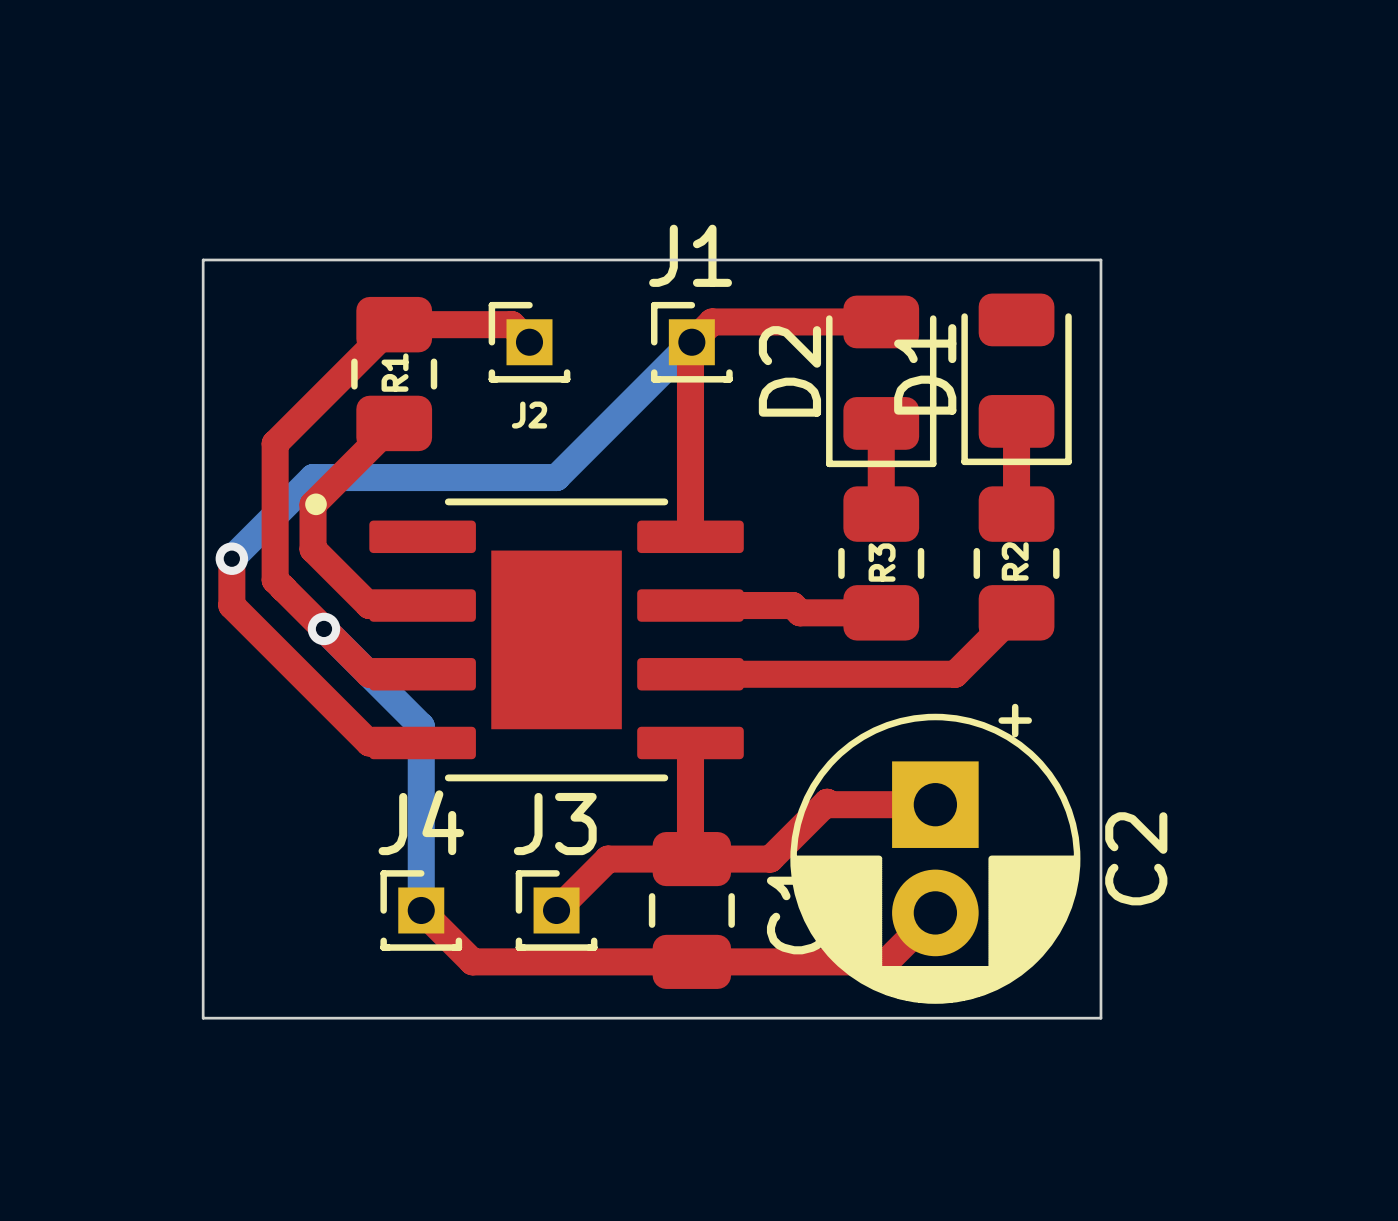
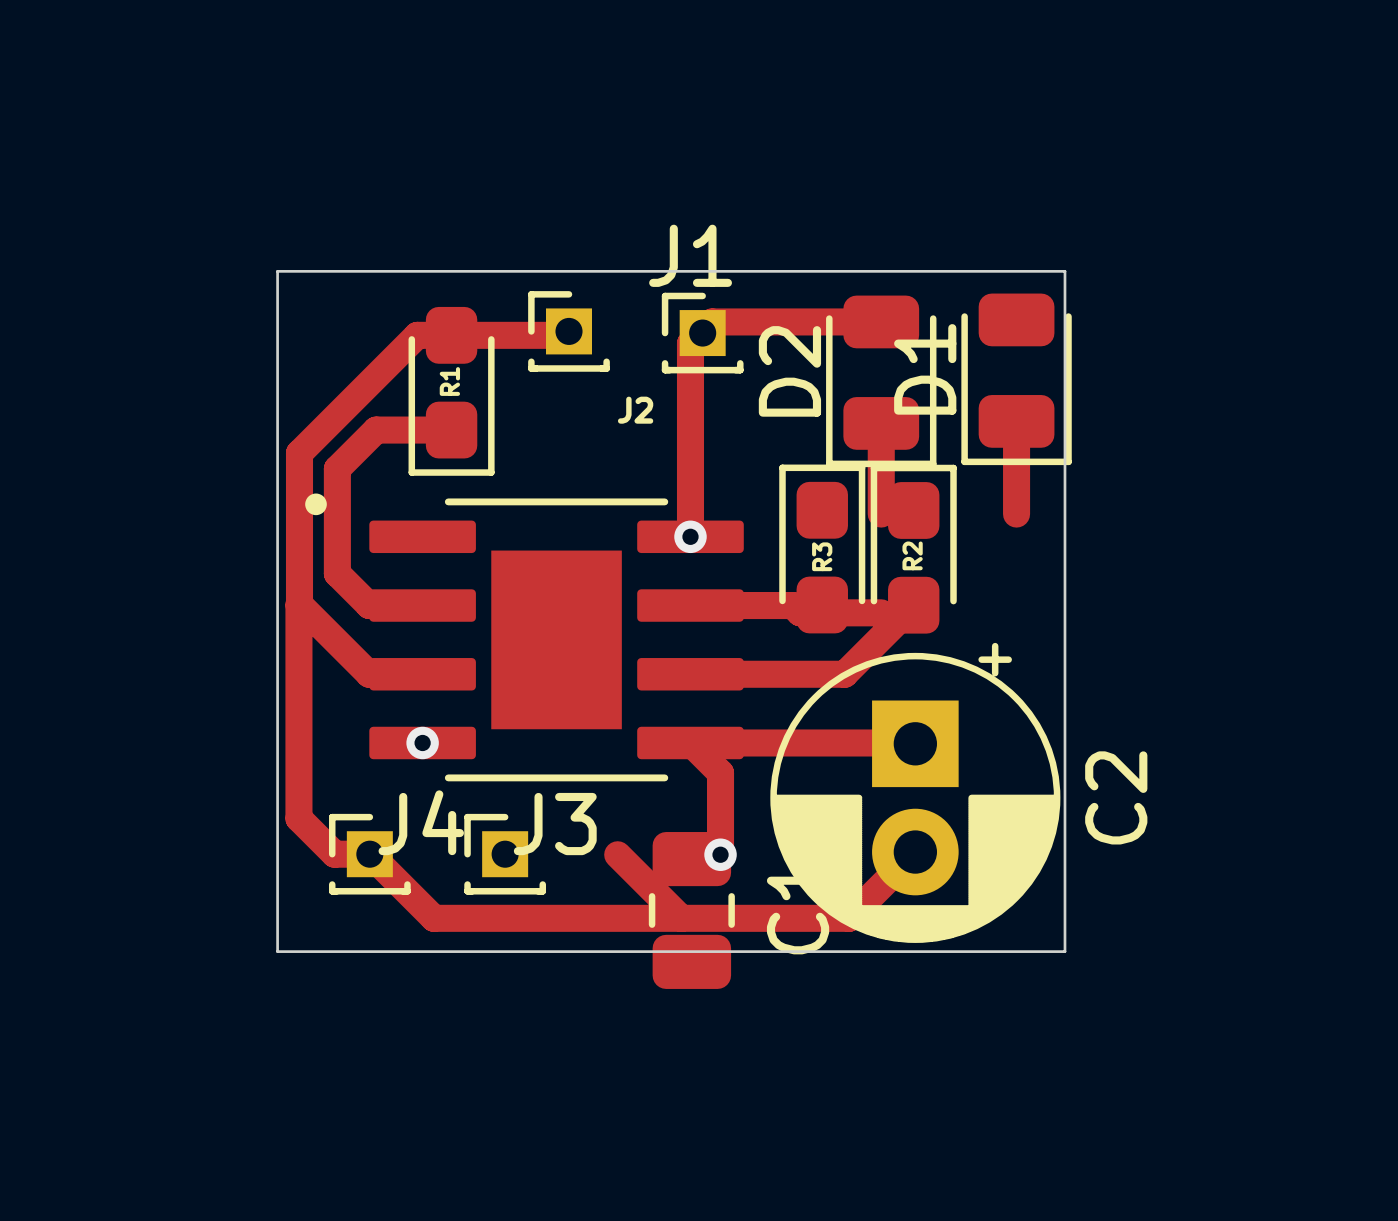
board edge: (203, 259) (1100, 259) (1100, 1018) (203, 1018) (203, 259) -> (277, 271) (277, 951) (1064, 951) (1064, 271) (277, 271)
R1 footprint: [351, 296, 438, 452] -> [408, 306, 495, 476]
top track: (394, 324) (275, 443) (275, 580) (299, 604) -> (569, 331) (565, 335) (417, 335) (299, 453) (299, 604)
top track: (394, 324) (511, 324) (529, 342) -> none
J2 position: (529, 342) -> (569, 331)
bottom track: (691, 342) (556, 477) (313, 477) (231, 558) -> none
J1 position: (691, 342) -> (702, 333)
J2 name position: J2 (529, 415) -> J2 (635, 410)
top track: (394, 423) (313, 504) (313, 549) (337, 573) -> (451, 430) (376, 430) (337, 468) (337, 573)
R3 footprint: [838, 486, 925, 641] -> [779, 464, 866, 634]
R2 footprint: [973, 486, 1060, 641] -> [870, 464, 957, 634]
via: none -> (690, 536)
top track: (231, 558) (231, 605) (369, 742) (422, 742) -> none
via: (231, 558) -> none
top track: none -> (298, 604) (298, 818) (334, 854) (369, 854) (433, 918) (849, 918) (915, 852)
top track: (1016, 612) (955, 674) (844, 674) -> (913, 605) (844, 674)
bottom track: (323, 628) (421, 726) (421, 910) -> none
via: (323, 628) -> none
via: none -> (422, 742)
top track: (690, 742) (691, 859) -> none
top track: none -> (915, 743) (690, 742) (720, 773) (720, 854)
top track: (935, 804) (829, 804) (827, 802) (770, 859) (607, 859) (556, 910) -> none
C2 position: (935, 853) -> (915, 792)
top track: none -> (617, 854) (681, 918)
via: none -> (720, 854)
top track: (421, 910) (472, 961) (886, 961) (935, 912) -> none
J4 position: (421, 910) -> (369, 854)
J3 position: (556, 910) -> (505, 854)

